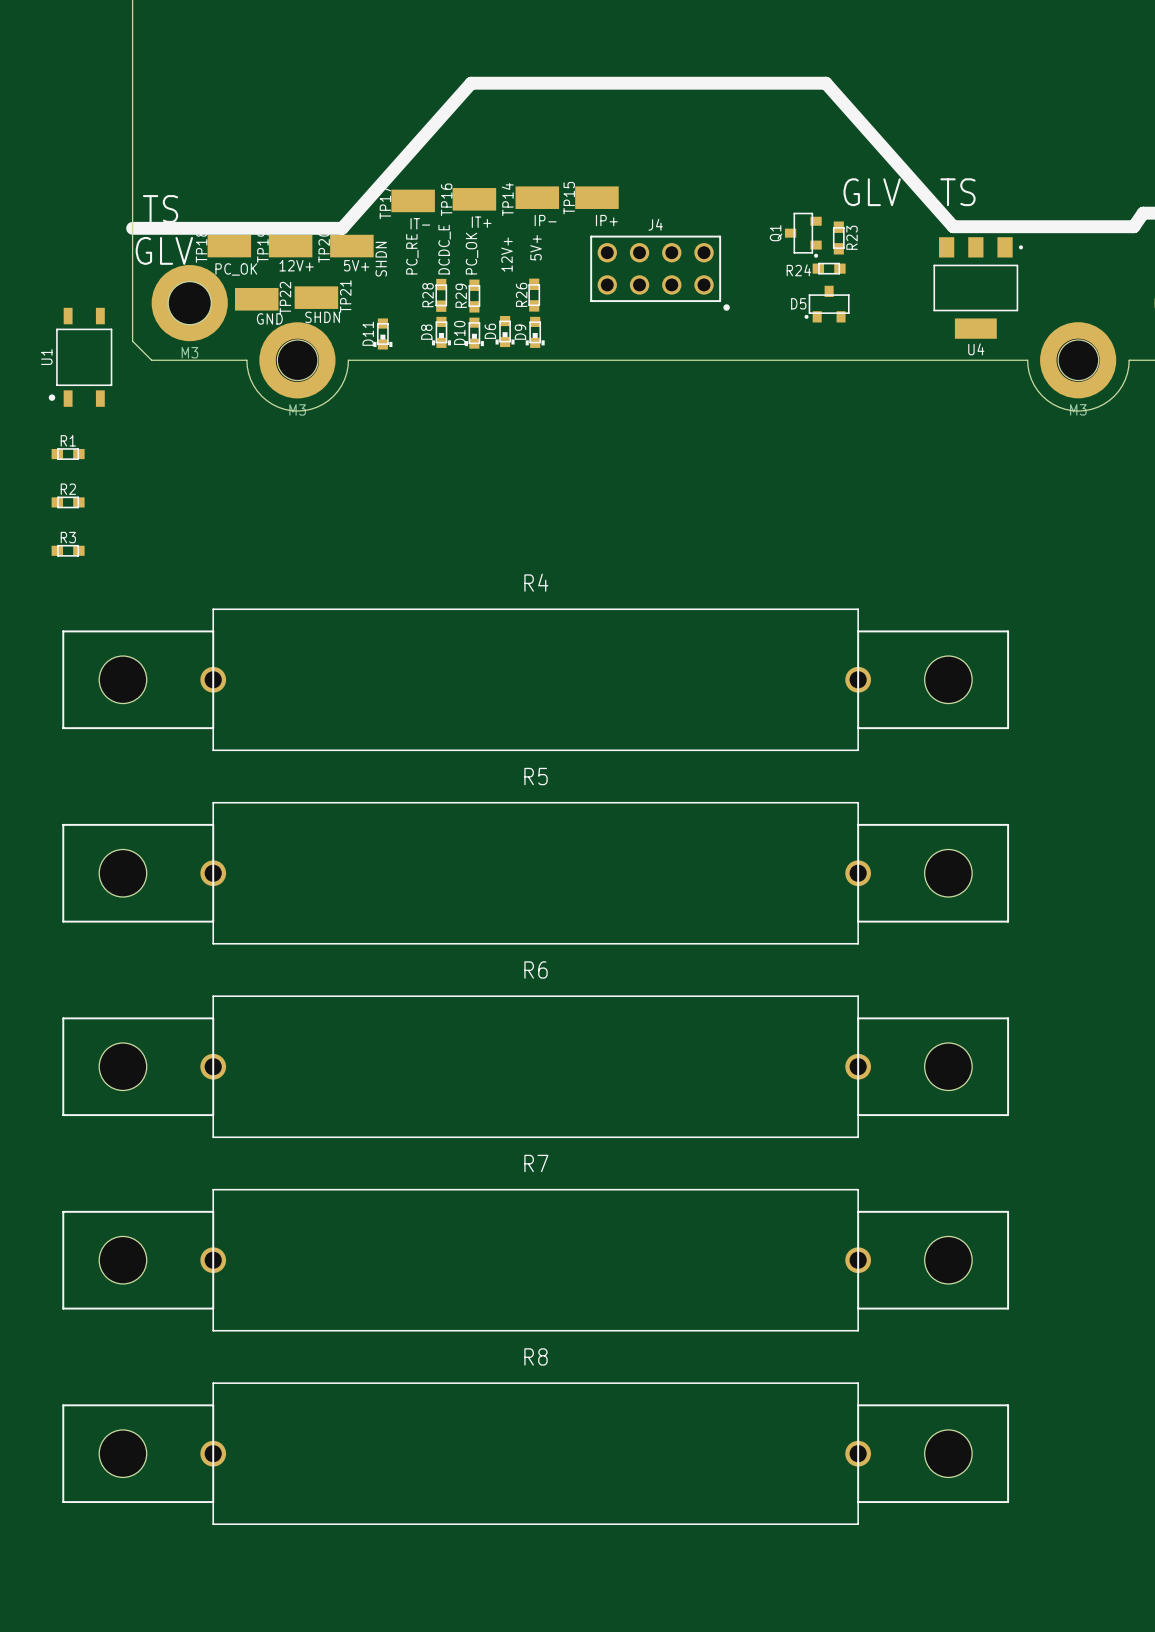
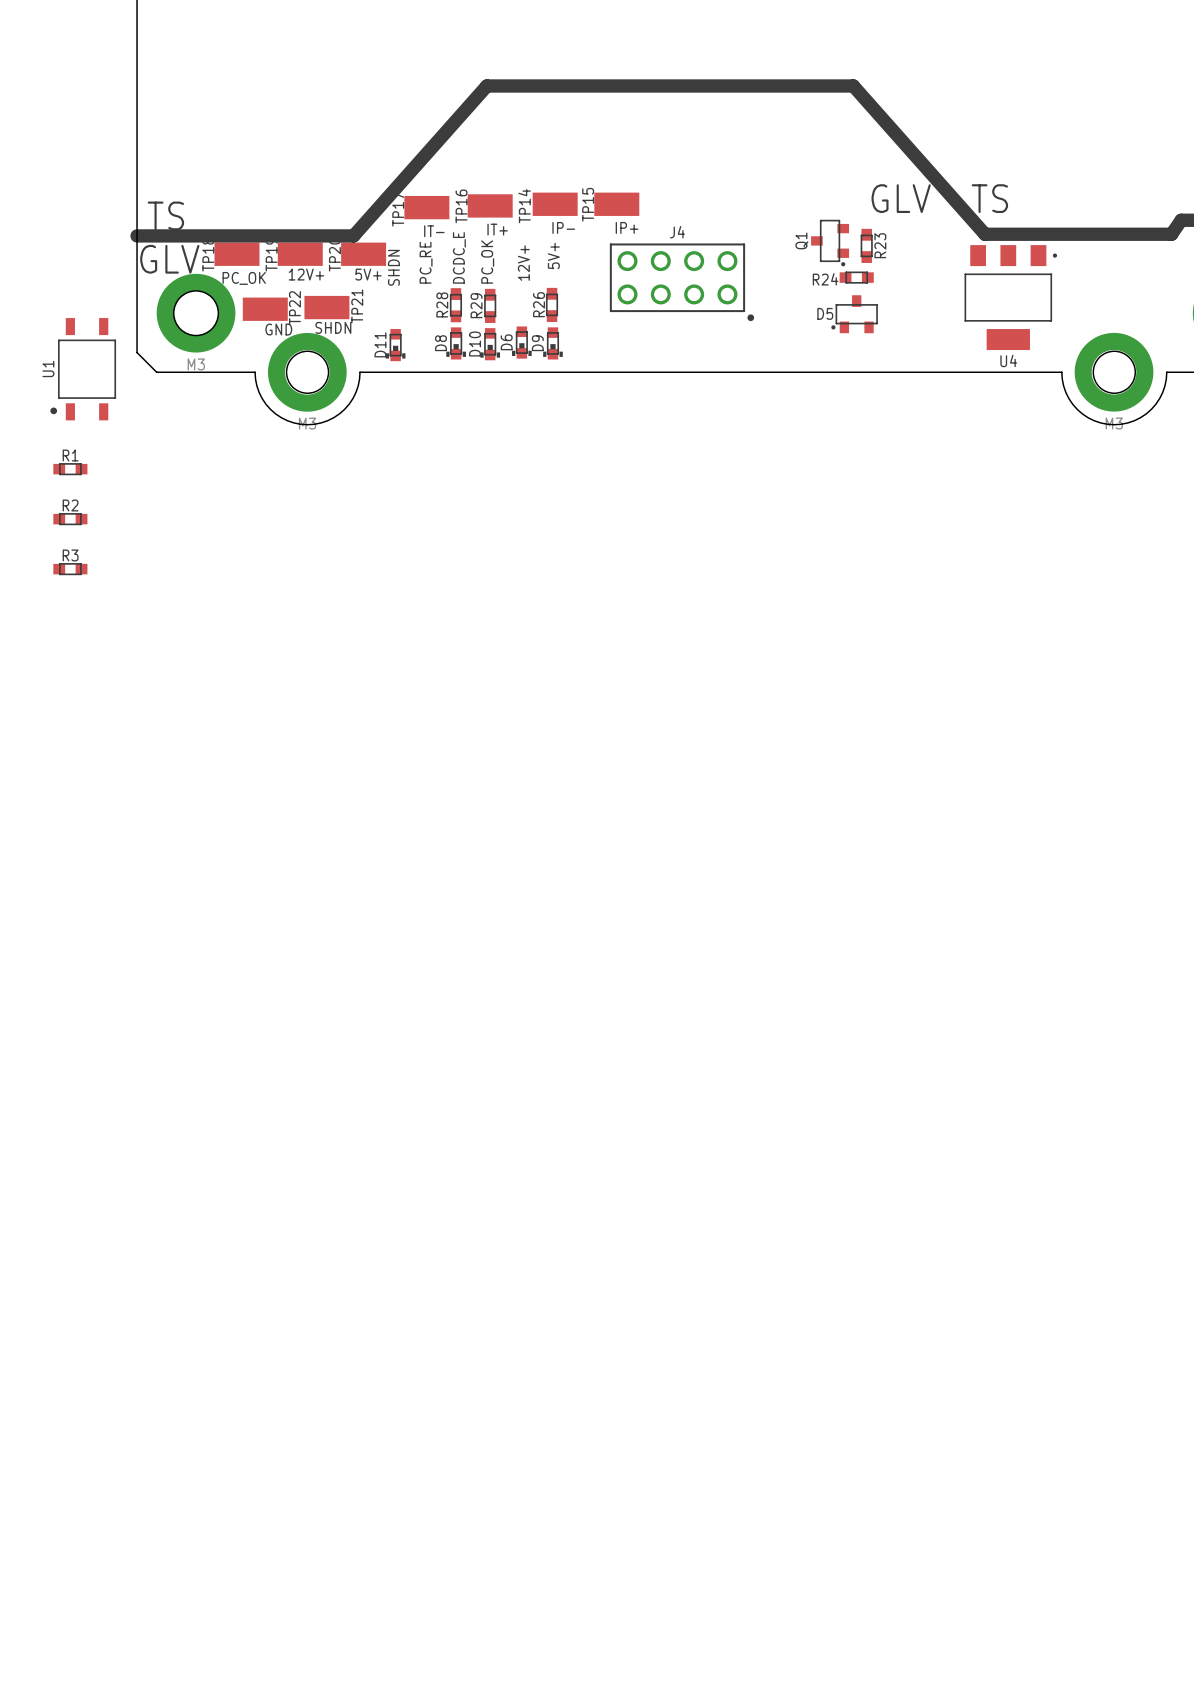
R4: (535, 679) -> none
R5: (535, 873) -> none
R6: (535, 1066) -> none
R7: (535, 1260) -> none
R8: (535, 1453) -> none

